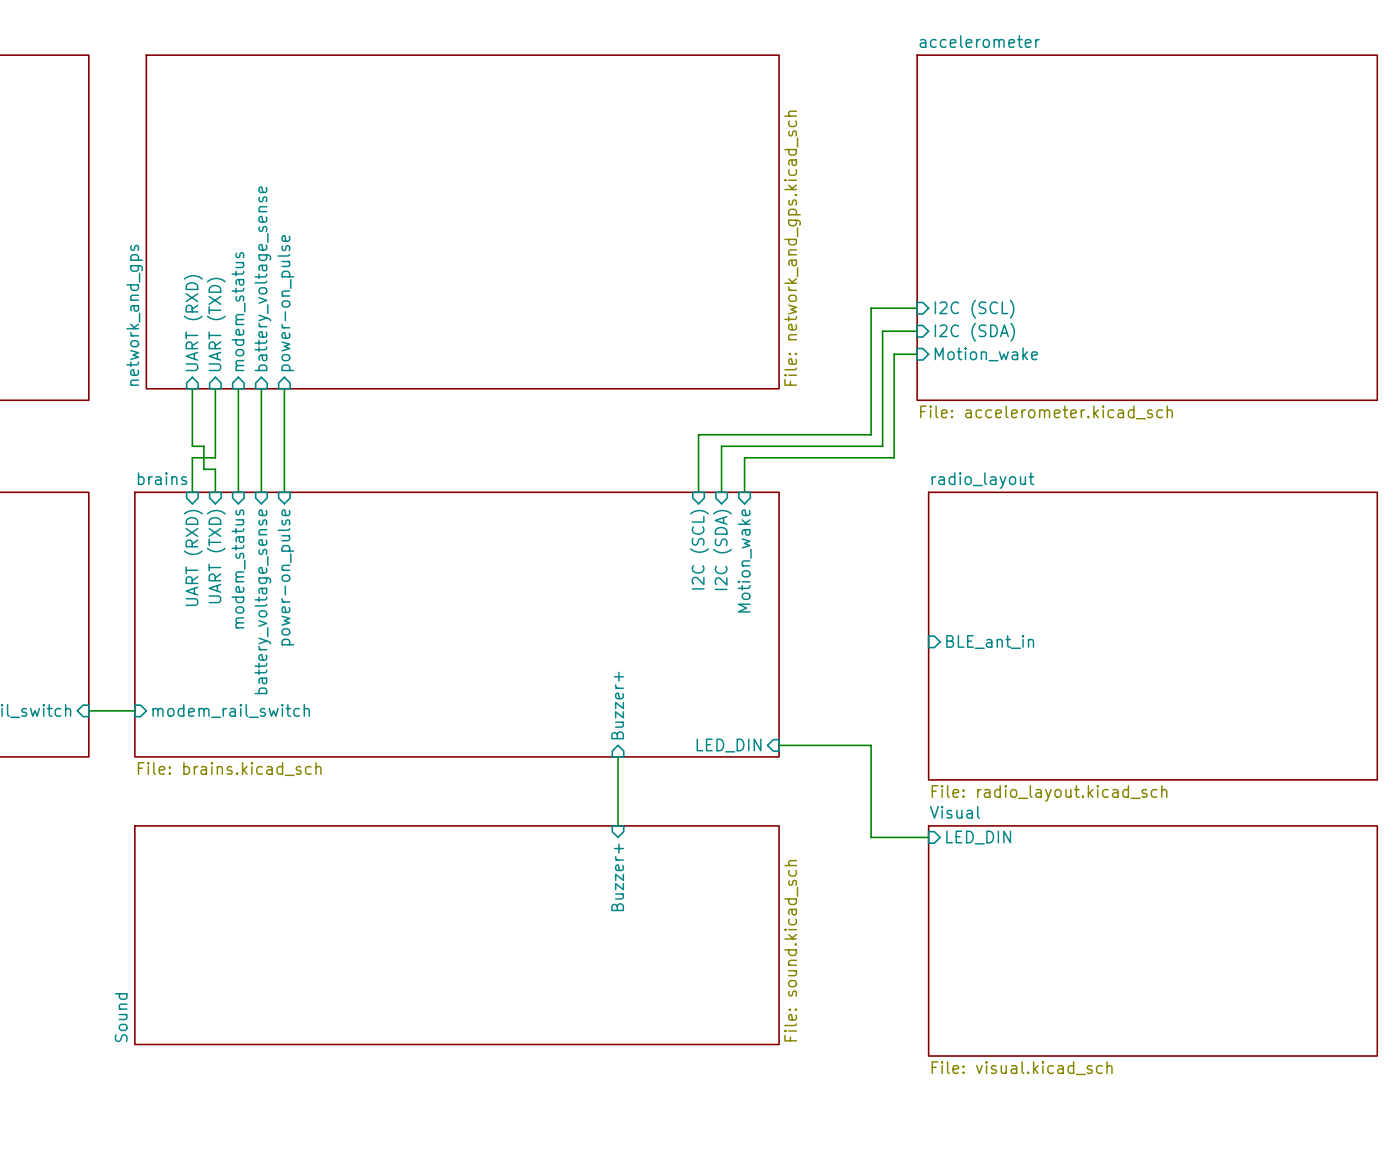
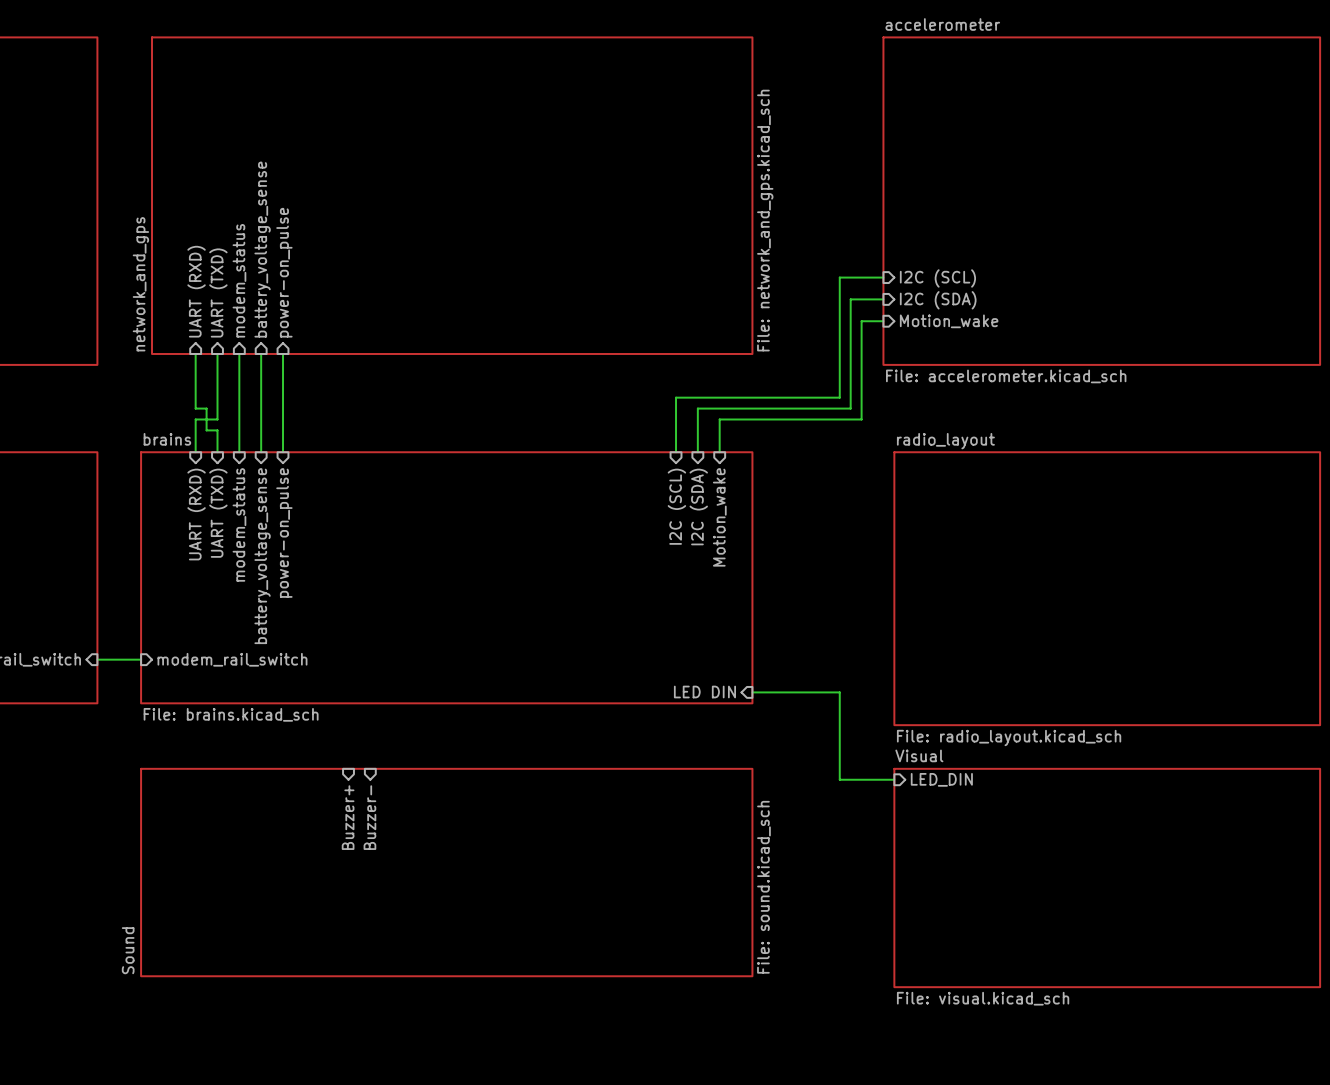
sheet pin: BLE_ant_in (990, 641) -> none
sheet pin: Buzzer+ (617, 705) -> none
sheet pin: LED_DIN (729, 745) -> LED DIN (704, 692)
wire: (618, 756) (618, 825) -> none
sheet pin: none -> Buzzer+ (348, 817)
sheet pin: none -> Buzzer- (369, 817)
sheet pin: Buzzer+ (617, 877) -> none

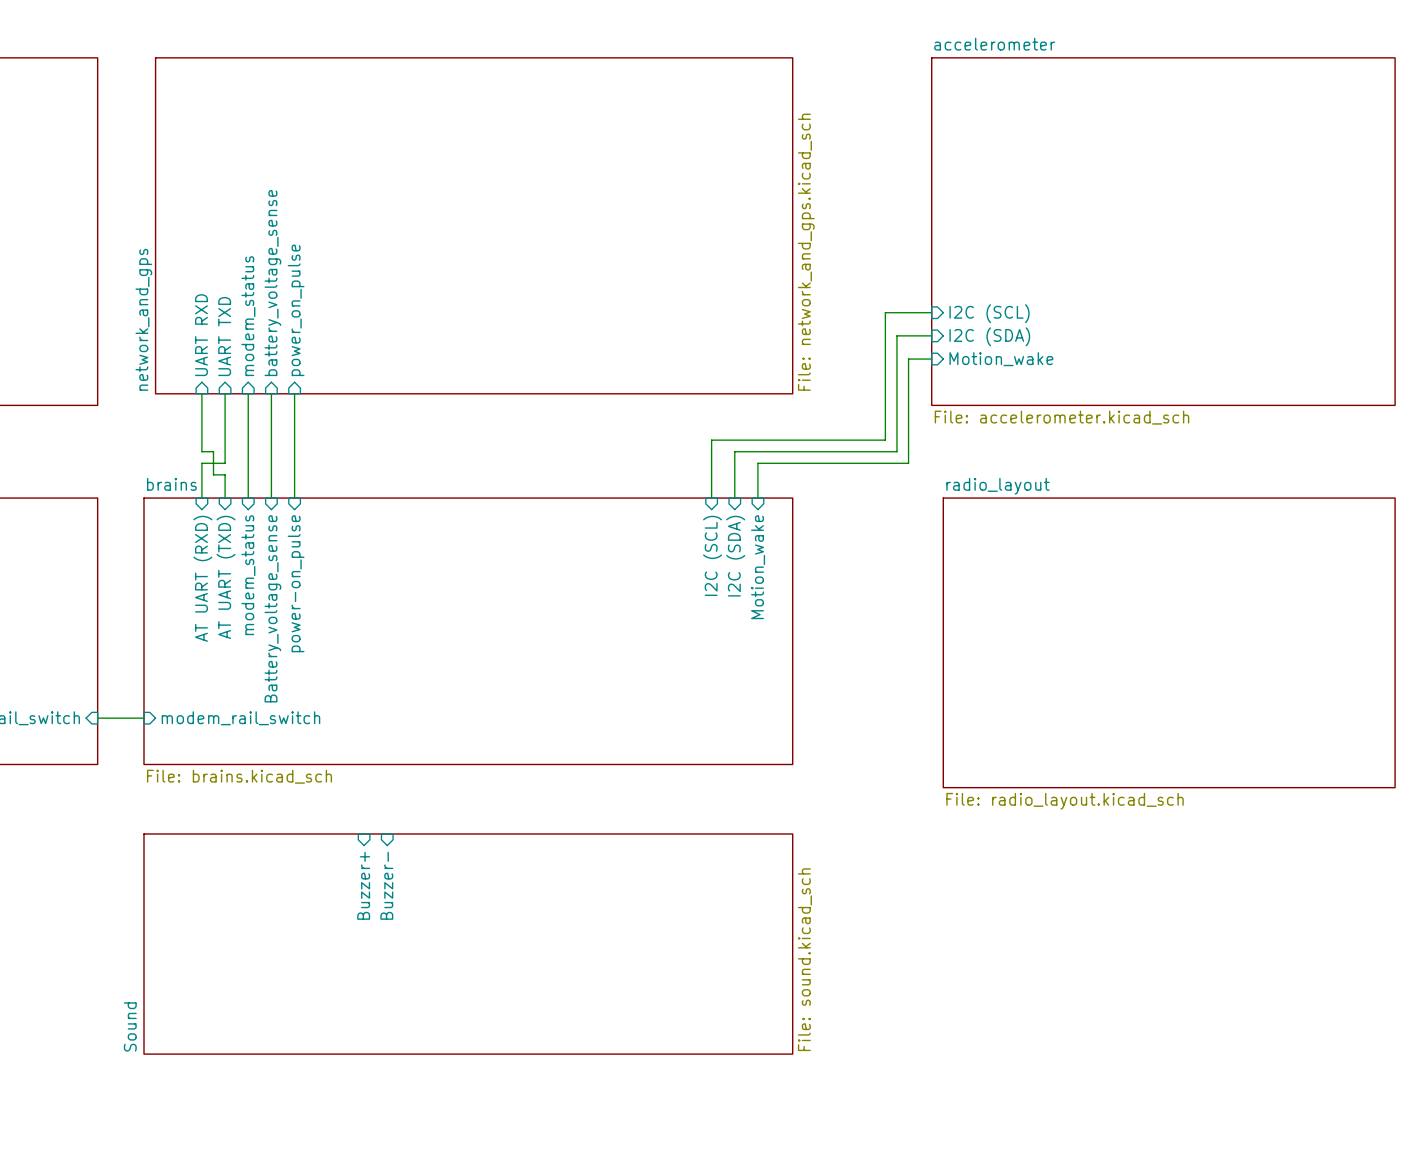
sheet pin: power-on_pulse (284, 272) -> power_on_pulse (296, 310)
sheet pin: UART (RXD) (196, 291) -> UART RXD (201, 335)
sheet pin: UART (TXD) (218, 292) -> UART TXD (224, 336)
sheet pin: UART (TXD) (218, 513) -> AT UART (TXD) (226, 577)
sheet pin: UART (RXD) (196, 514) -> AT UART (RXD) (202, 578)
sheet pin: battery_voltage_sense (262, 556) -> Battery_voltage_sense (272, 608)
sheet pin: LED DIN (704, 692) -> none
wire: (752, 692) (839, 692) (839, 779) (894, 779) -> none
sheet pin: LED_DIN (941, 779) -> none
sheet Visual: File: visual.kicad_sch (1107, 878) -> none

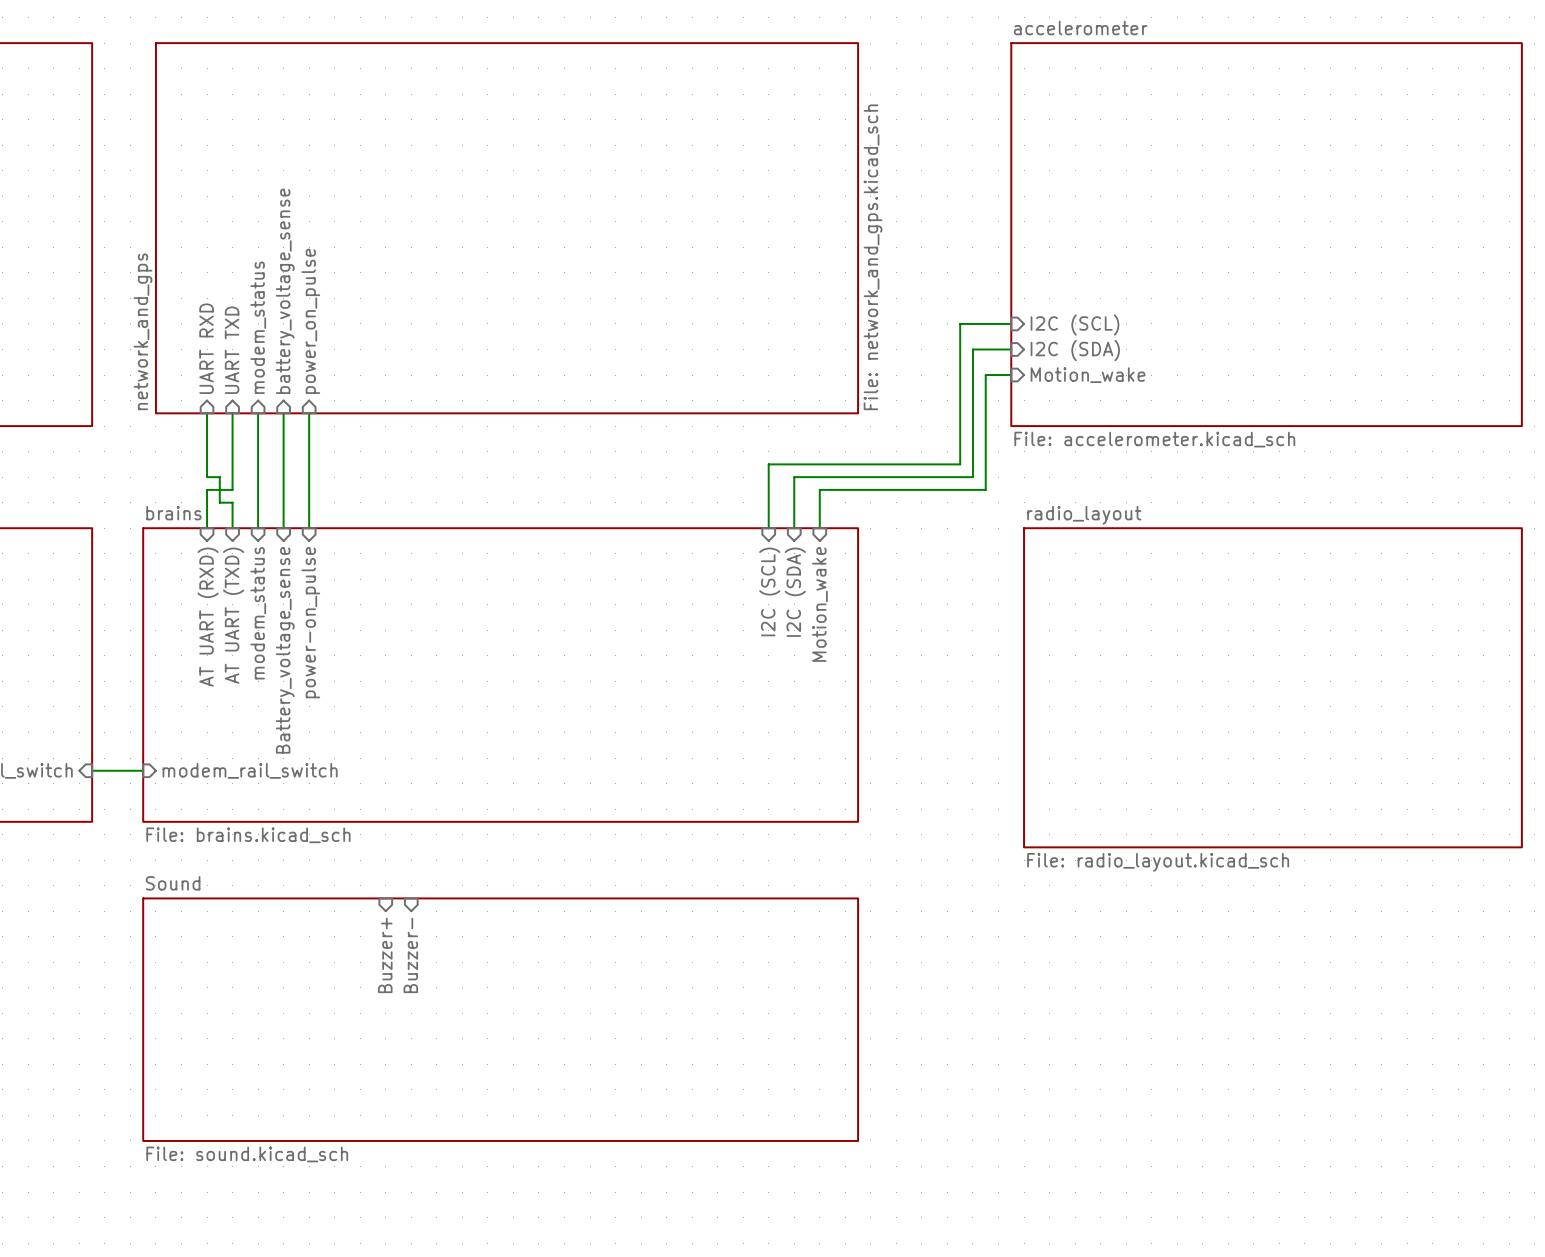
sheet Sound value rotation: 0° (804, 959) -> 90° clockwise (247, 1154)
sheet Sound value position: File: sound.kicad_sch (804, 959) -> File: sound.kicad_sch (247, 1154)
sheet Sound name rotation: 0° (130, 1026) -> 90° clockwise (173, 883)
sheet Sound name position: Sound (130, 1026) -> Sound (173, 883)

